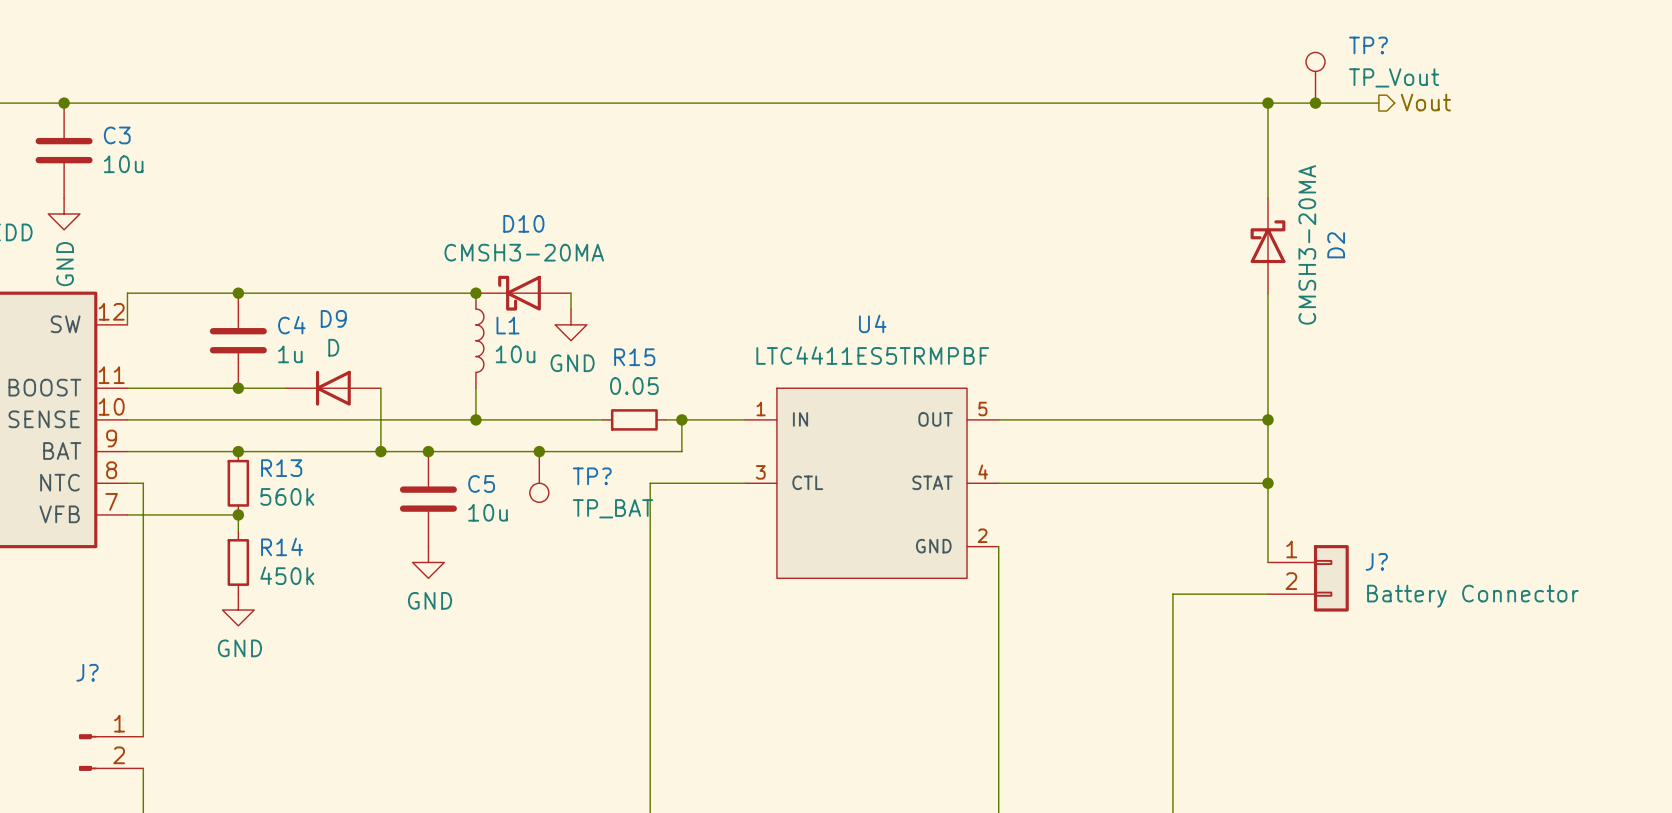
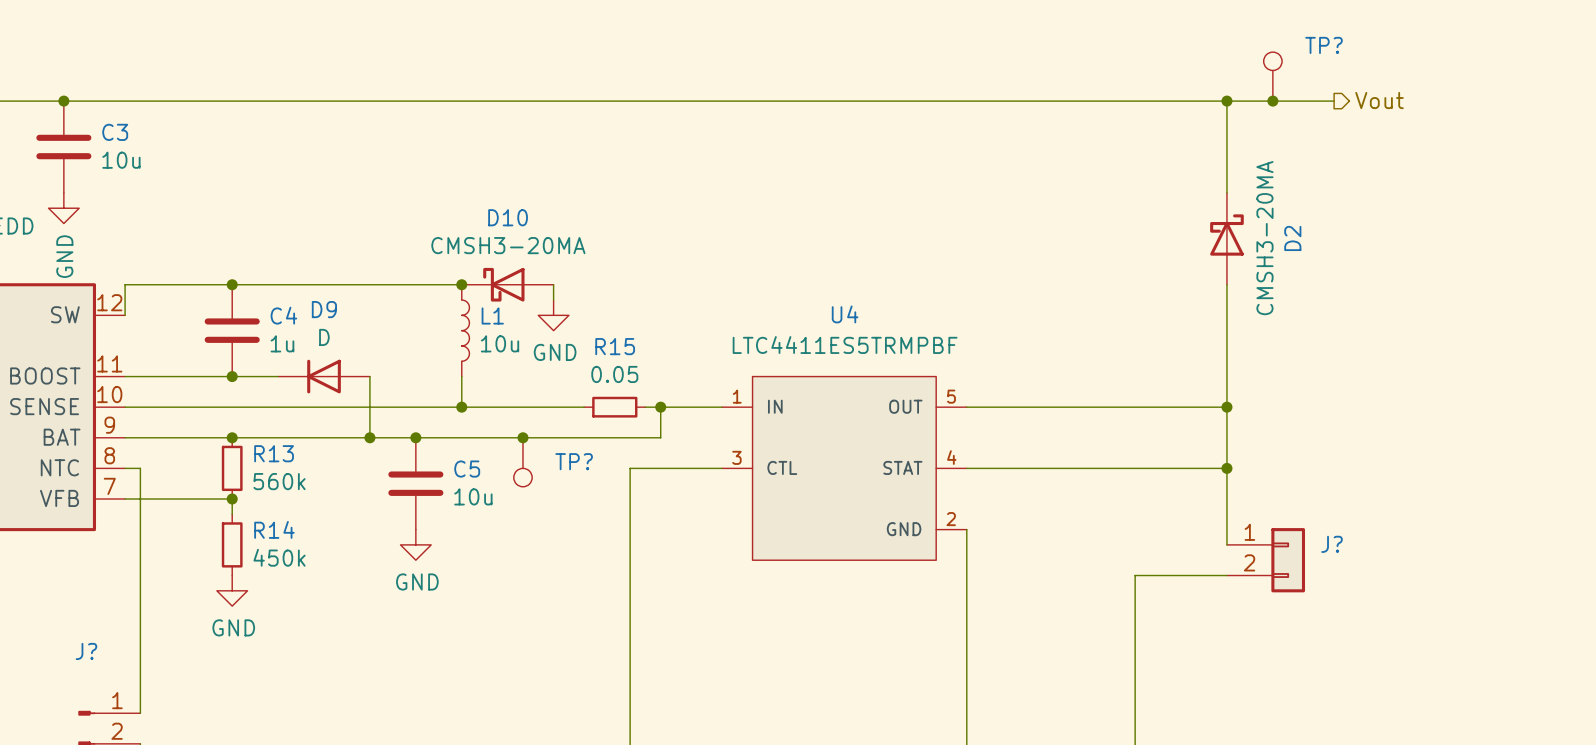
TP? value: TP_Vout (1394, 77) -> none
TP? value: TP_BAT (612, 508) -> none
J? value: Battery Connector (1472, 596) -> none

